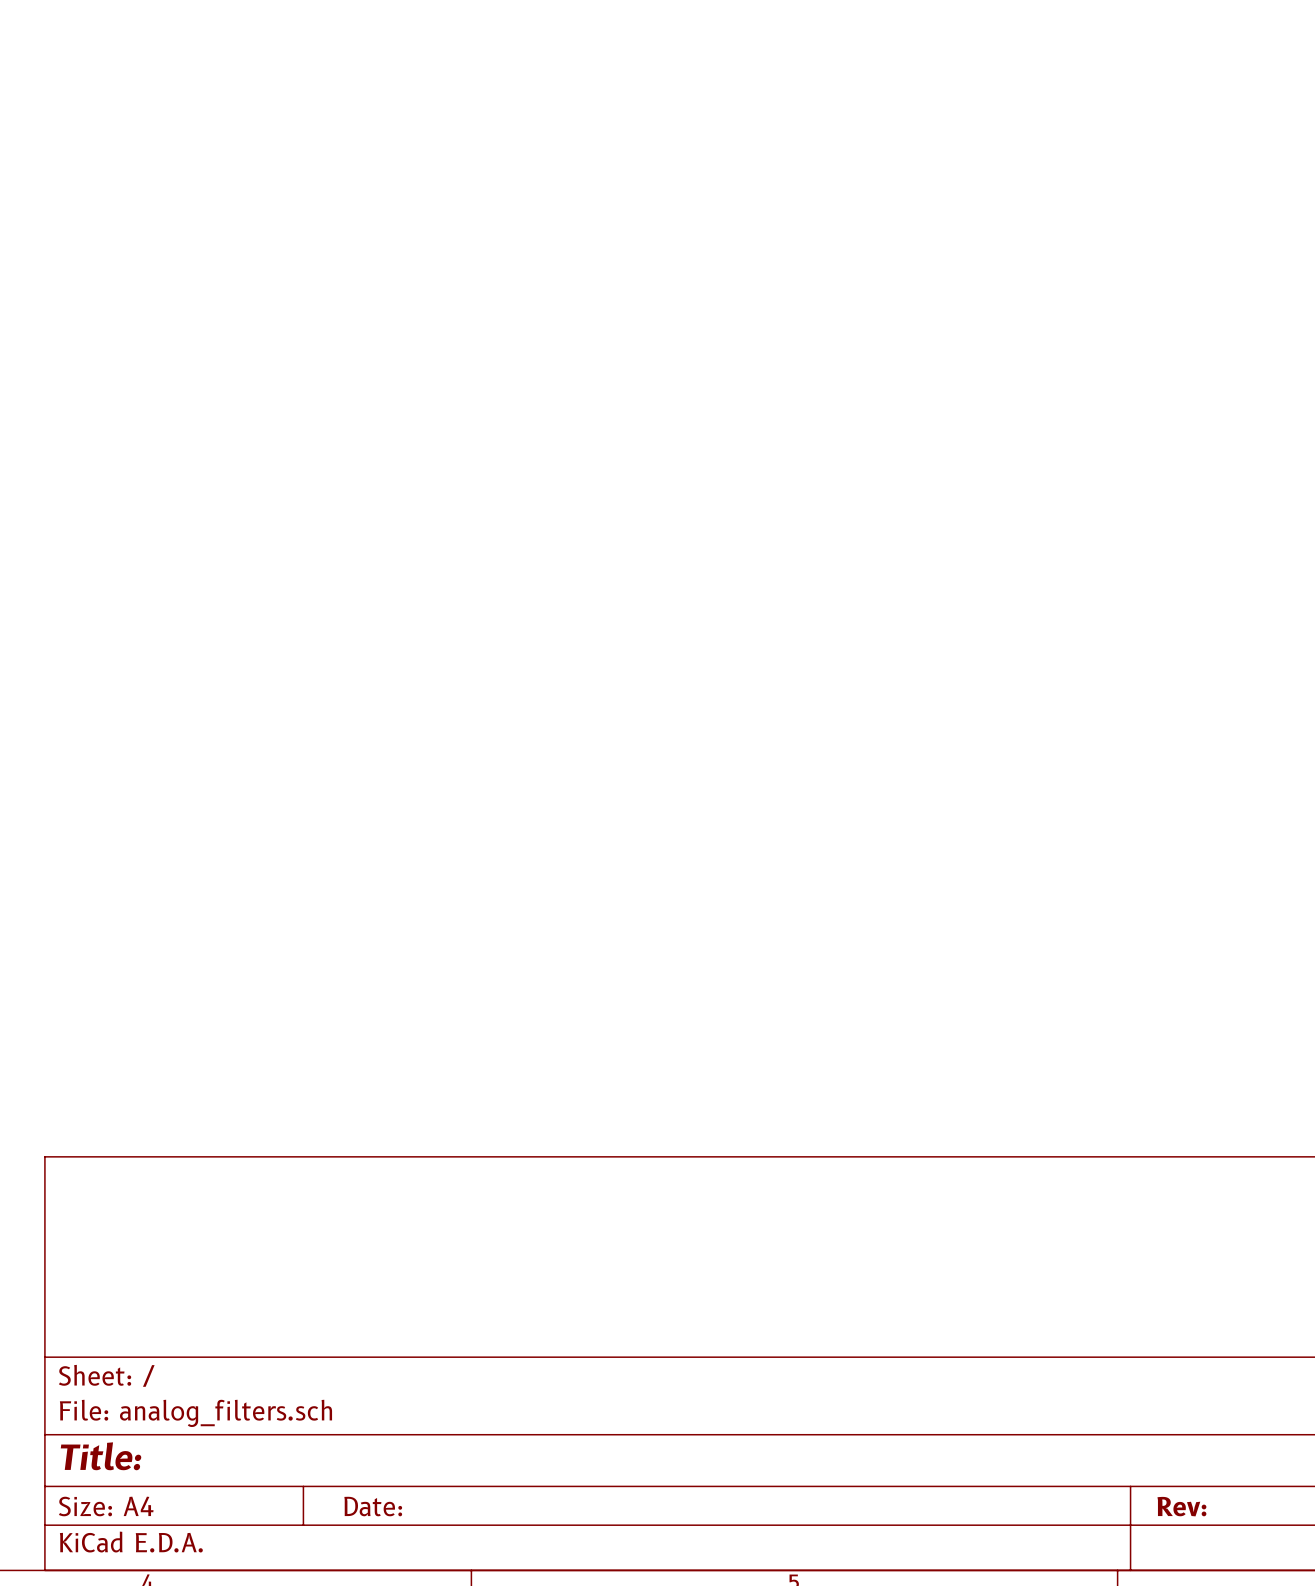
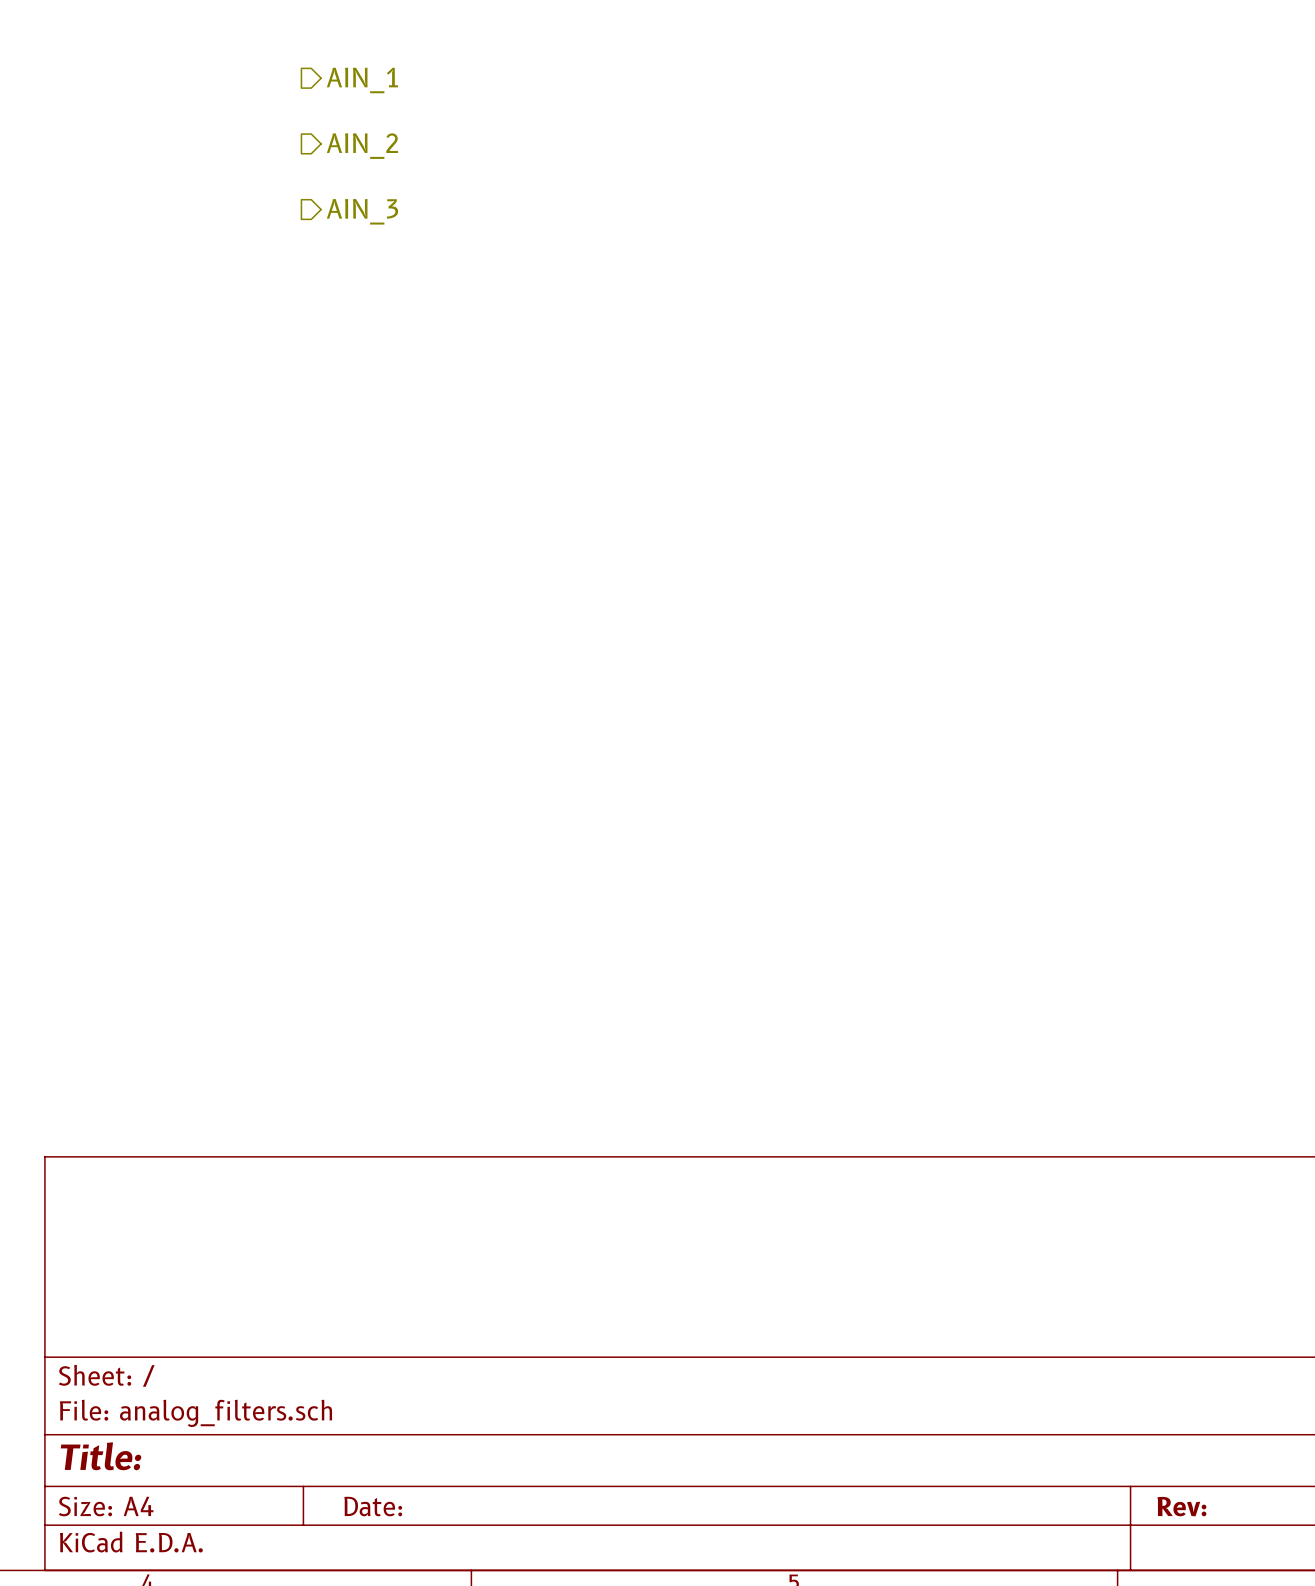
hierarchical label: none -> AIN_1 (362, 80)
hierarchical label: none -> AIN_2 (362, 146)
hierarchical label: none -> AIN_3 (362, 211)

